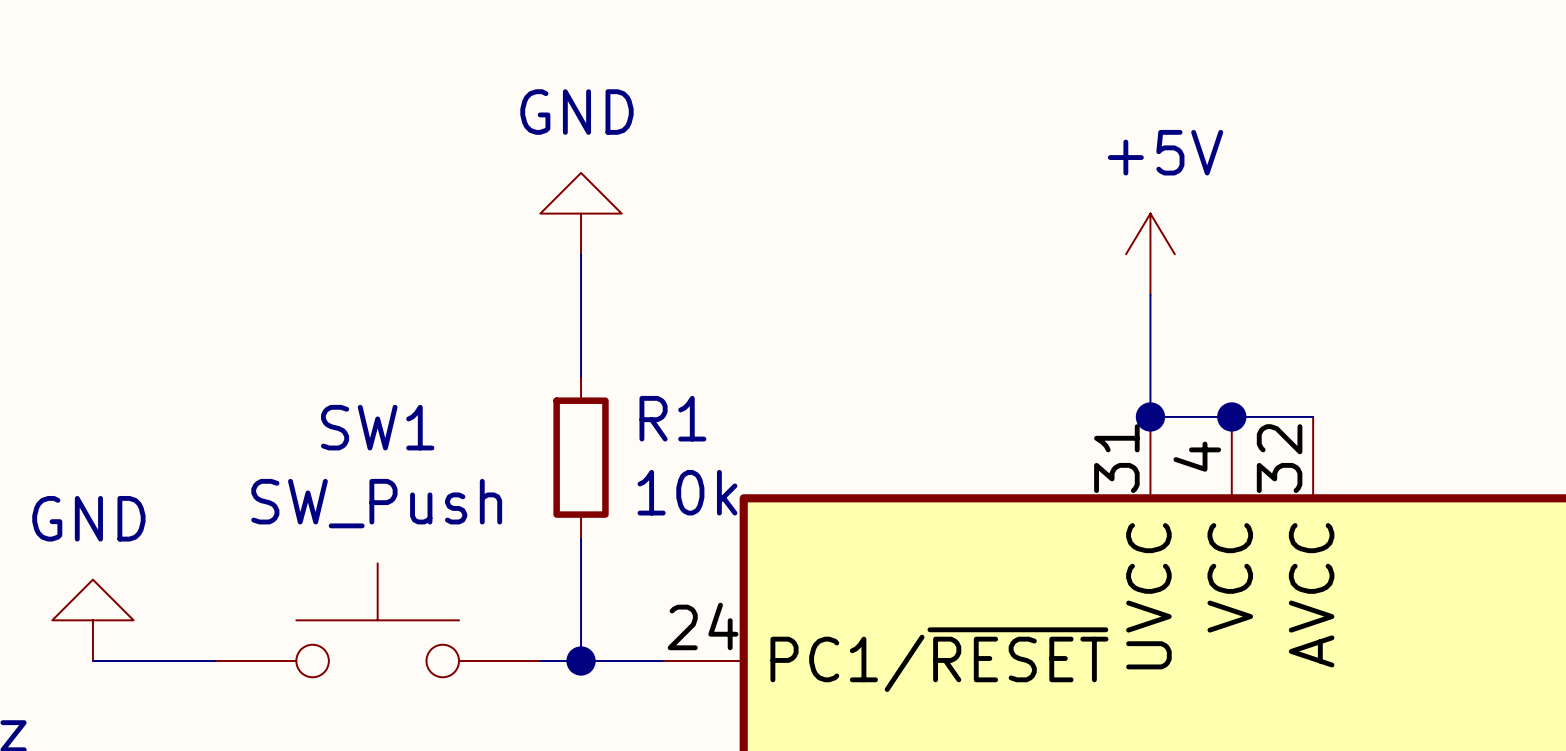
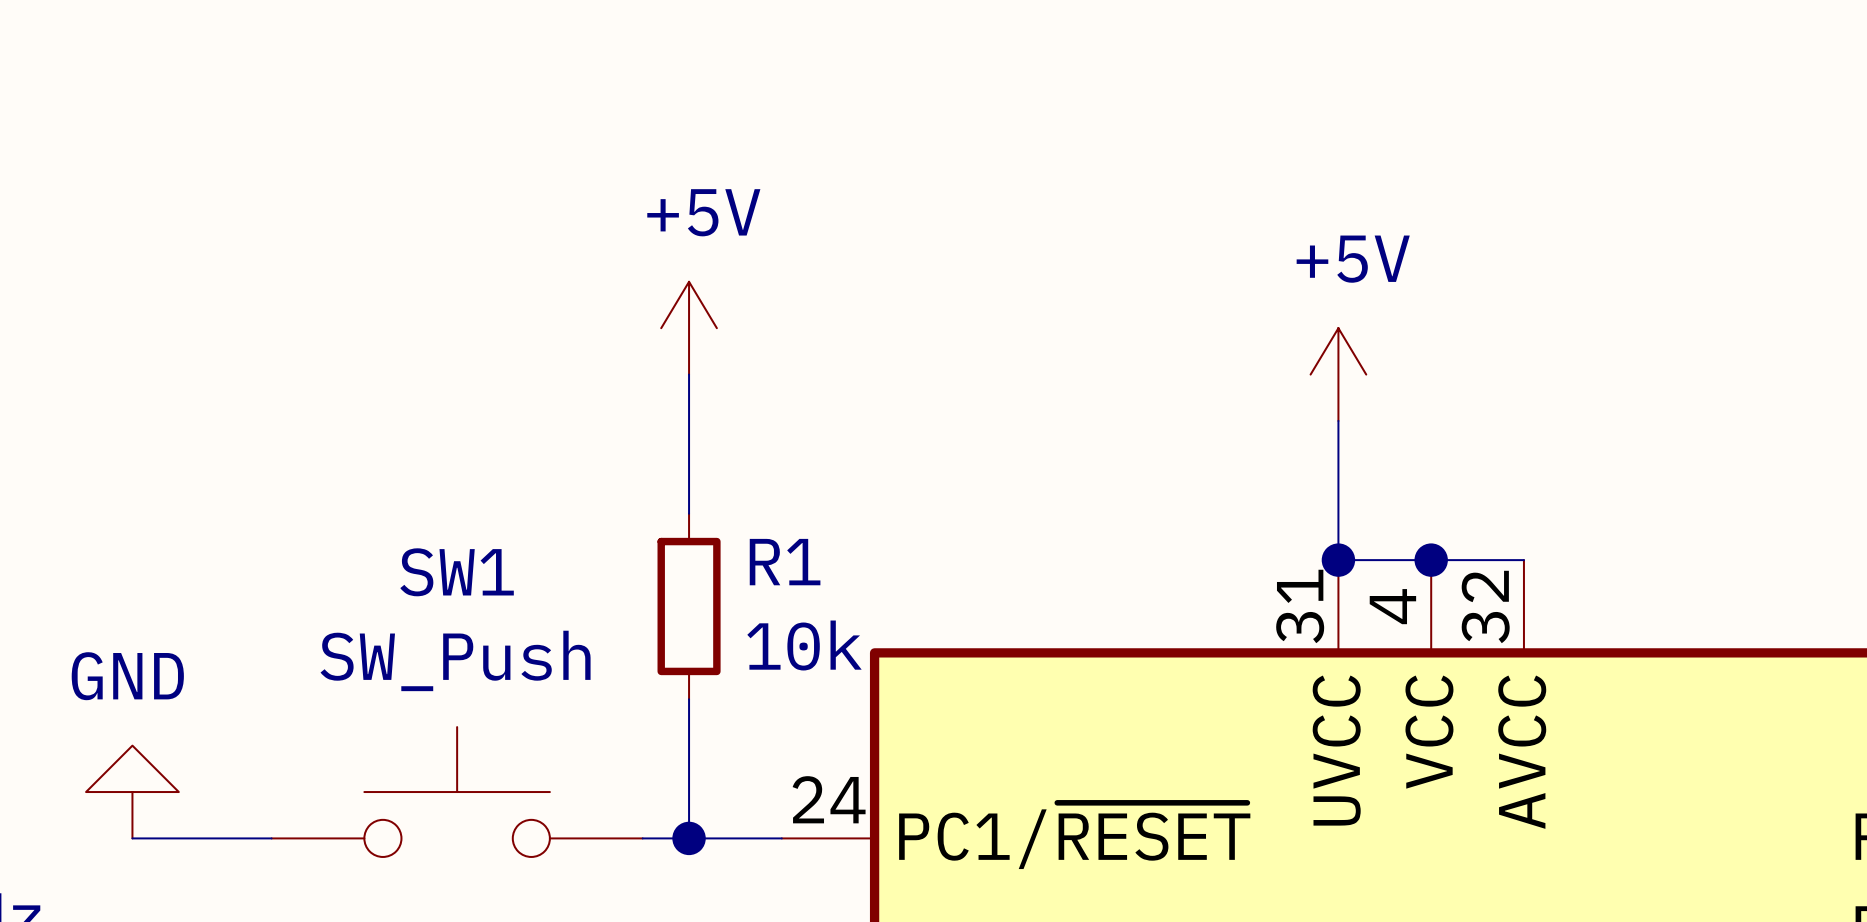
power symbol: GND (581, 213) -> +5V (689, 328)

